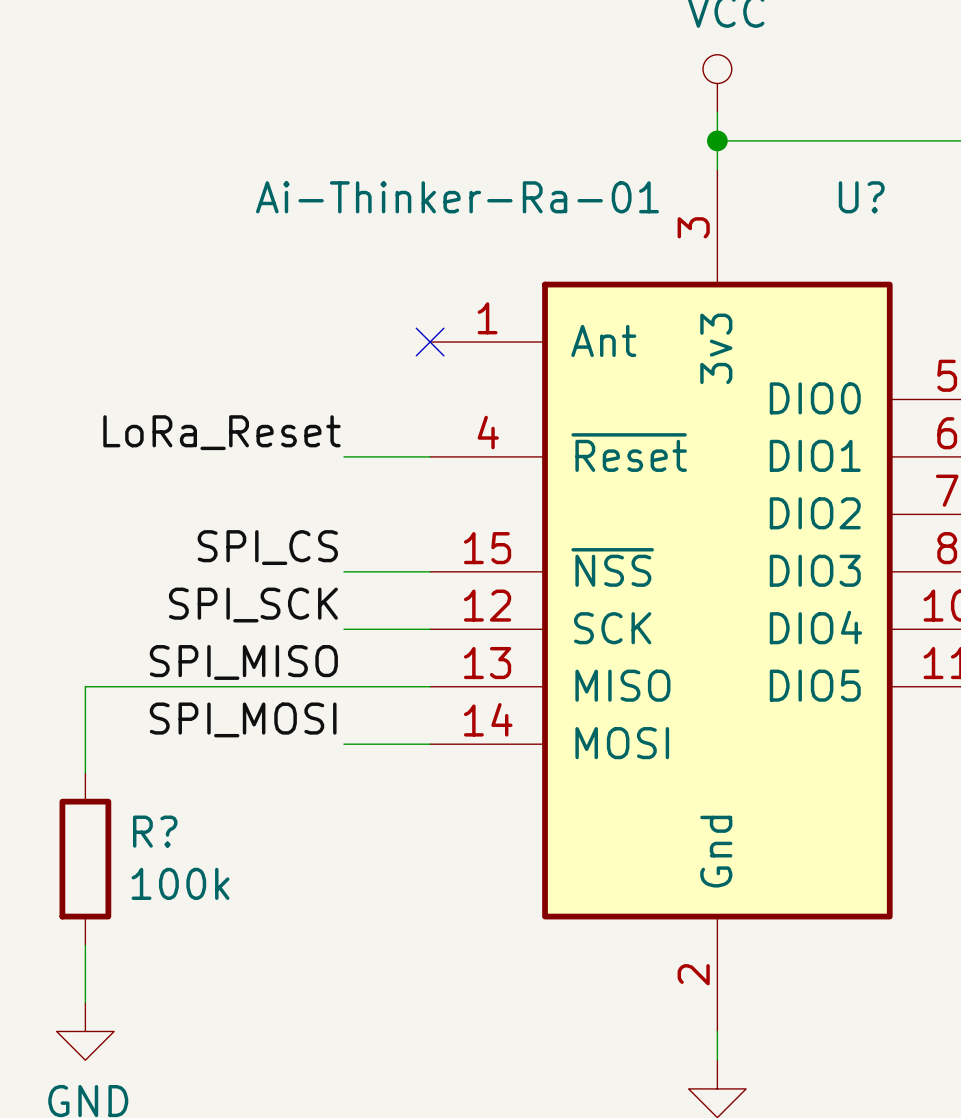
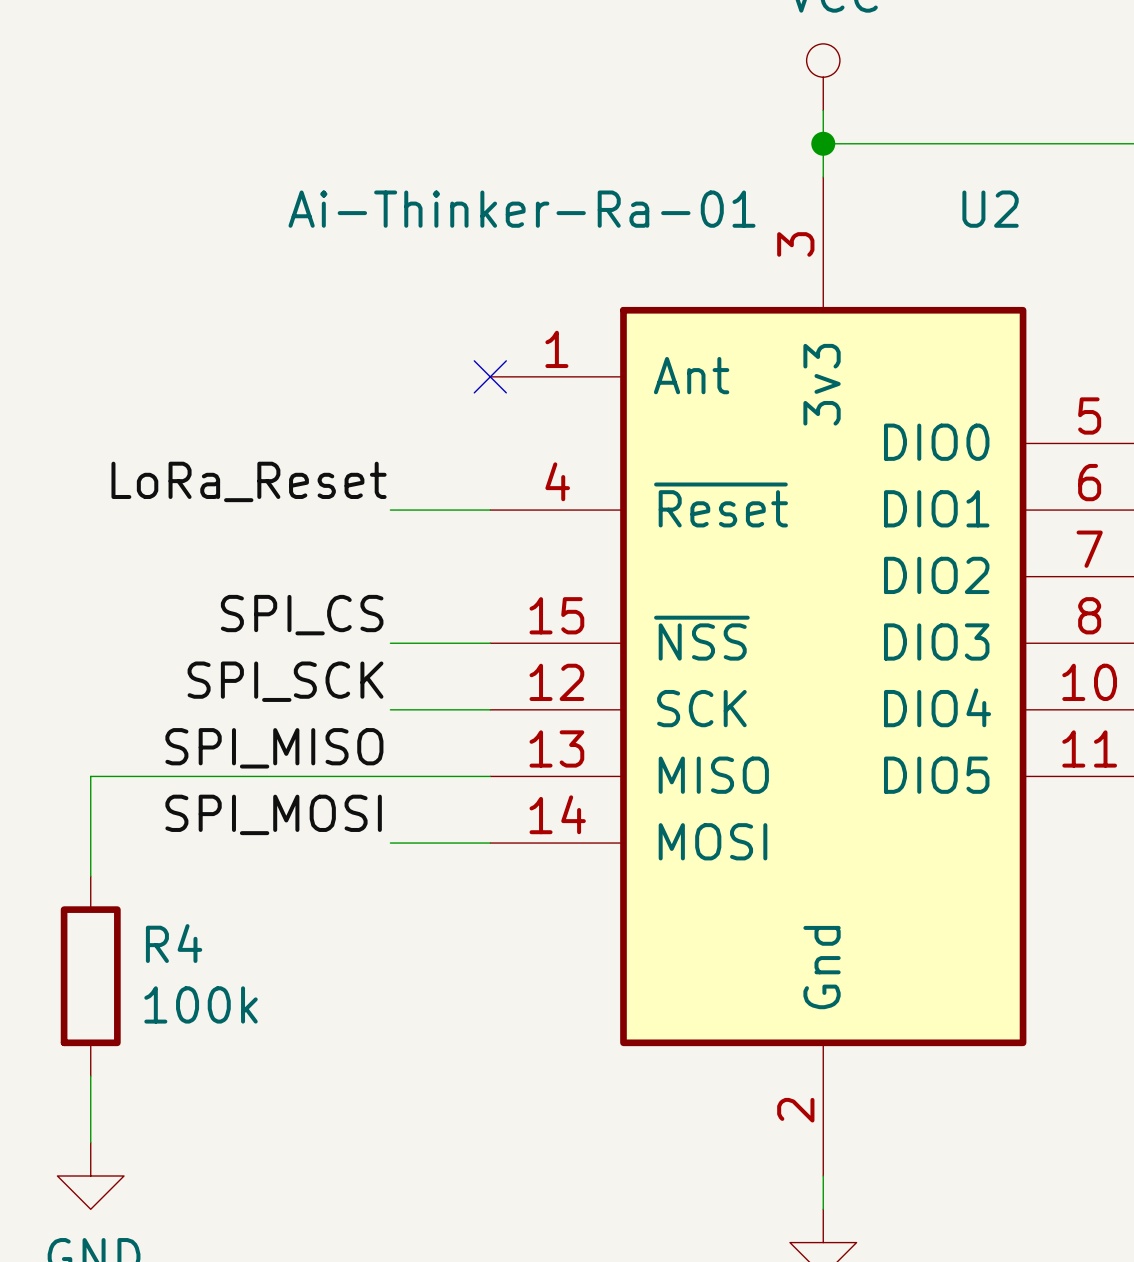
U? name: U? (861, 197) -> U2 (990, 209)
R? name: R? (155, 831) -> R4 (174, 943)

